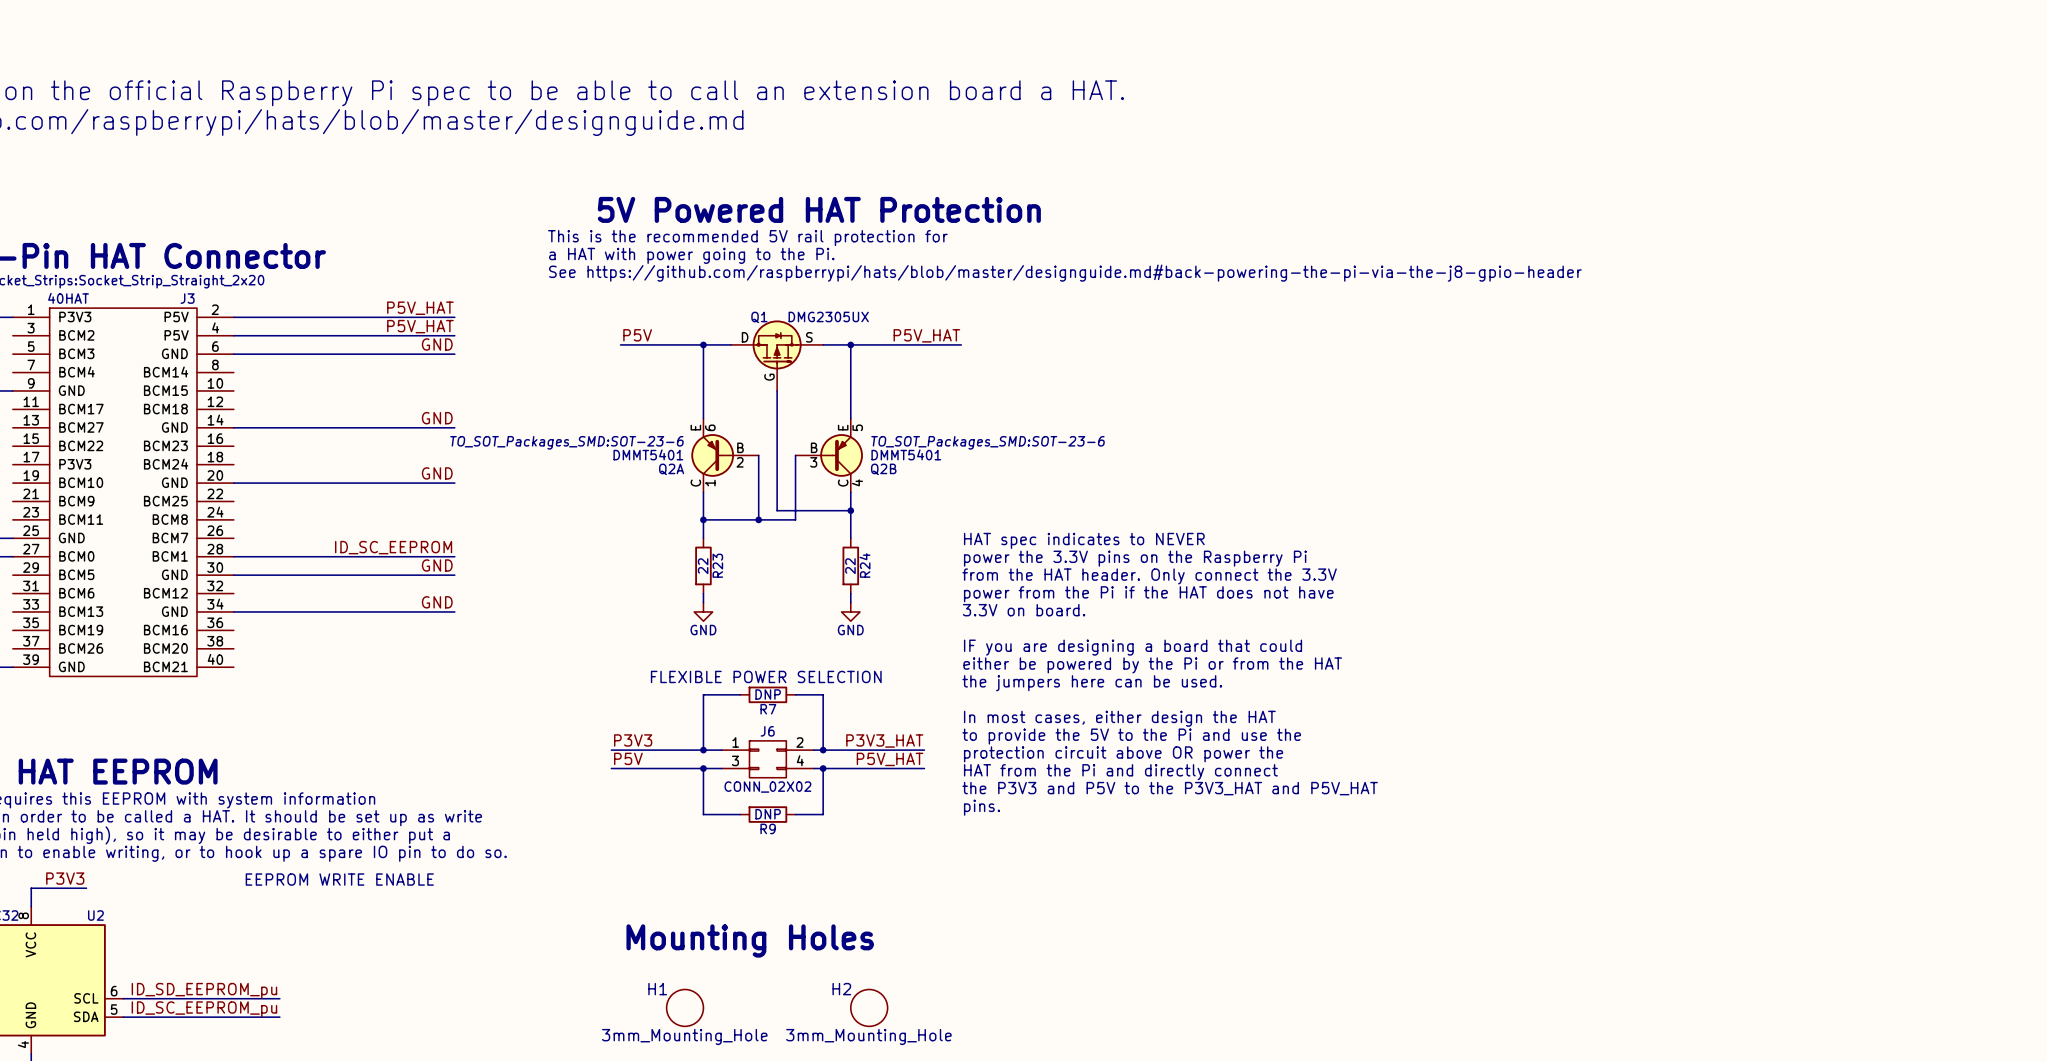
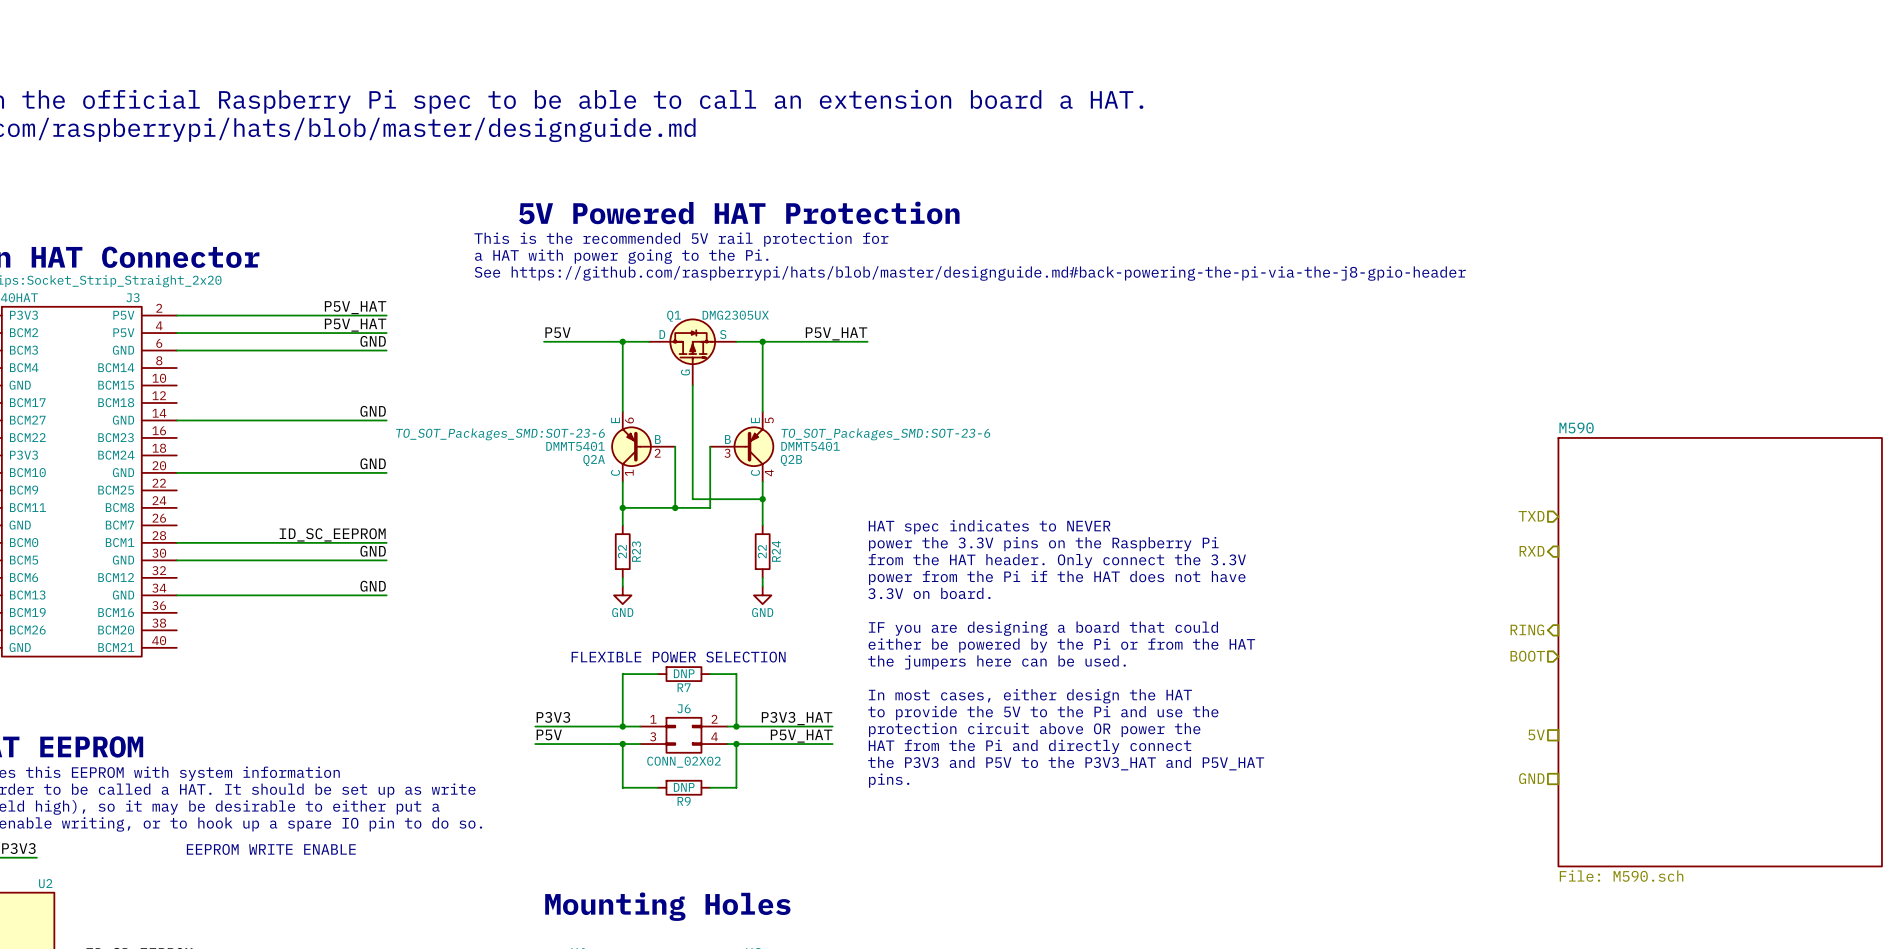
hierarchical label: none -> TXD (1531, 516)
hierarchical label: none -> RXD (1532, 551)
hierarchical label: none -> RING (1527, 629)
sheet M590: none -> File: M590.sch (1720, 652)
hierarchical label: none -> BOOT (1527, 656)
hierarchical label: none -> 5V (1536, 734)
hierarchical label: none -> GND (1531, 778)

